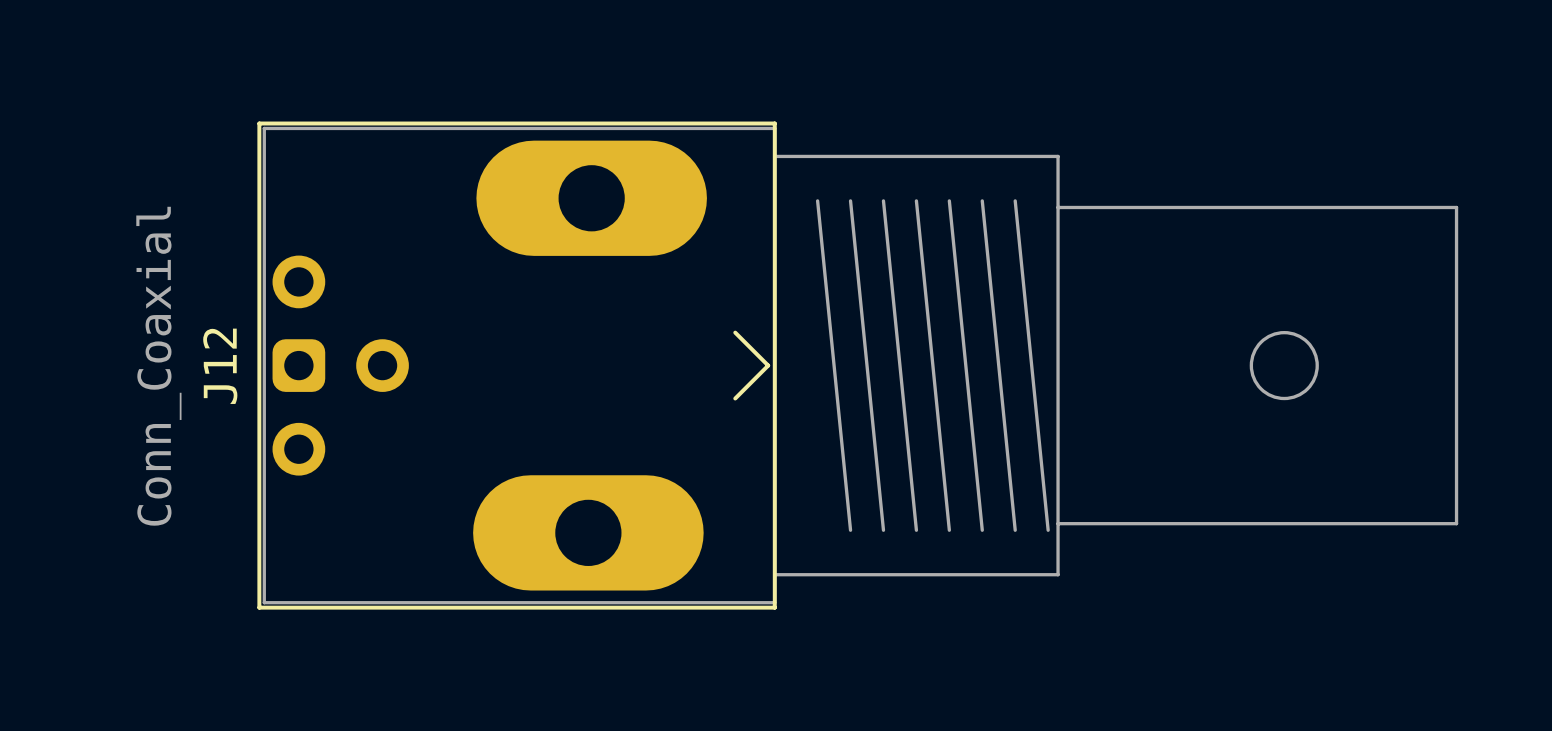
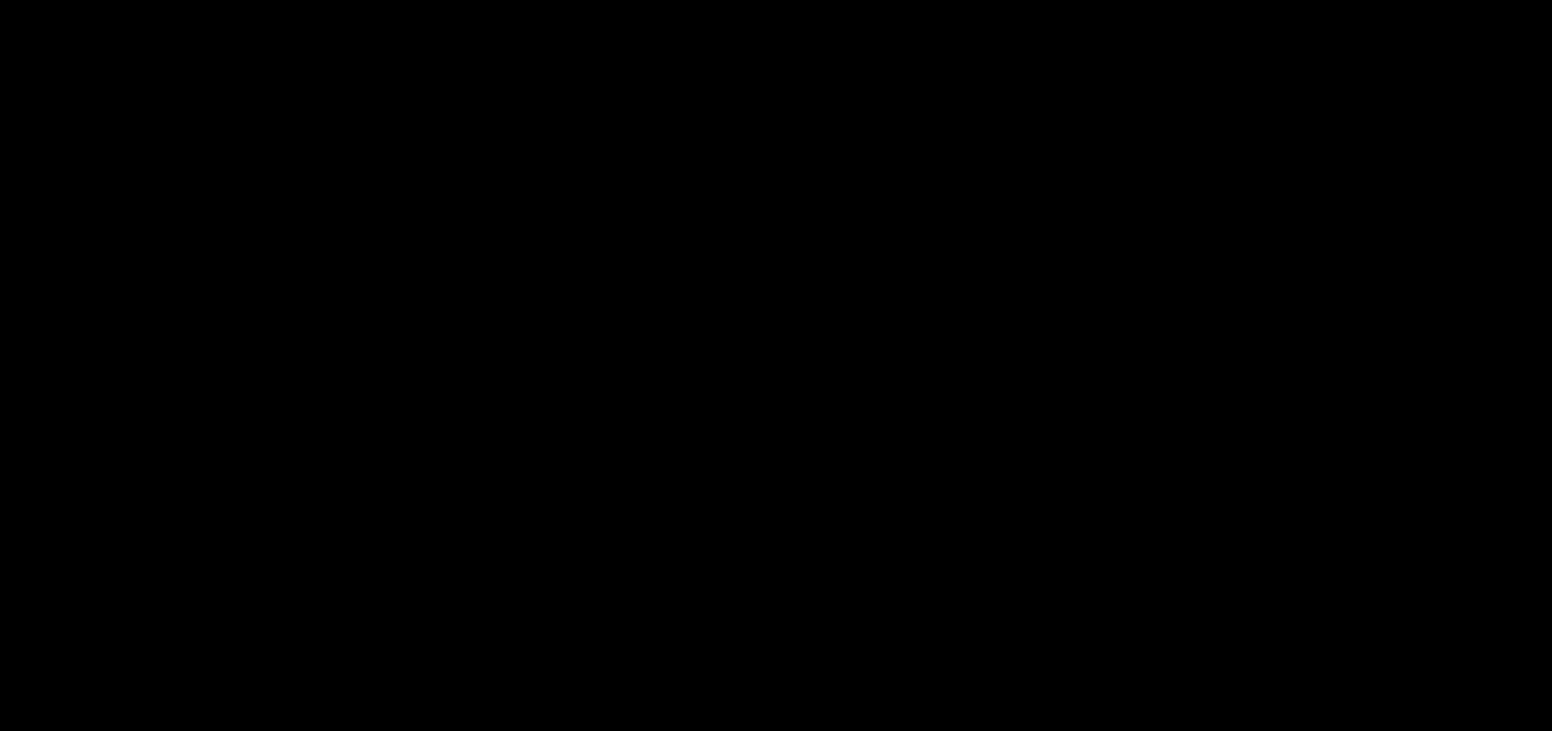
J12: Conn_Coaxial (857, 365) -> none

